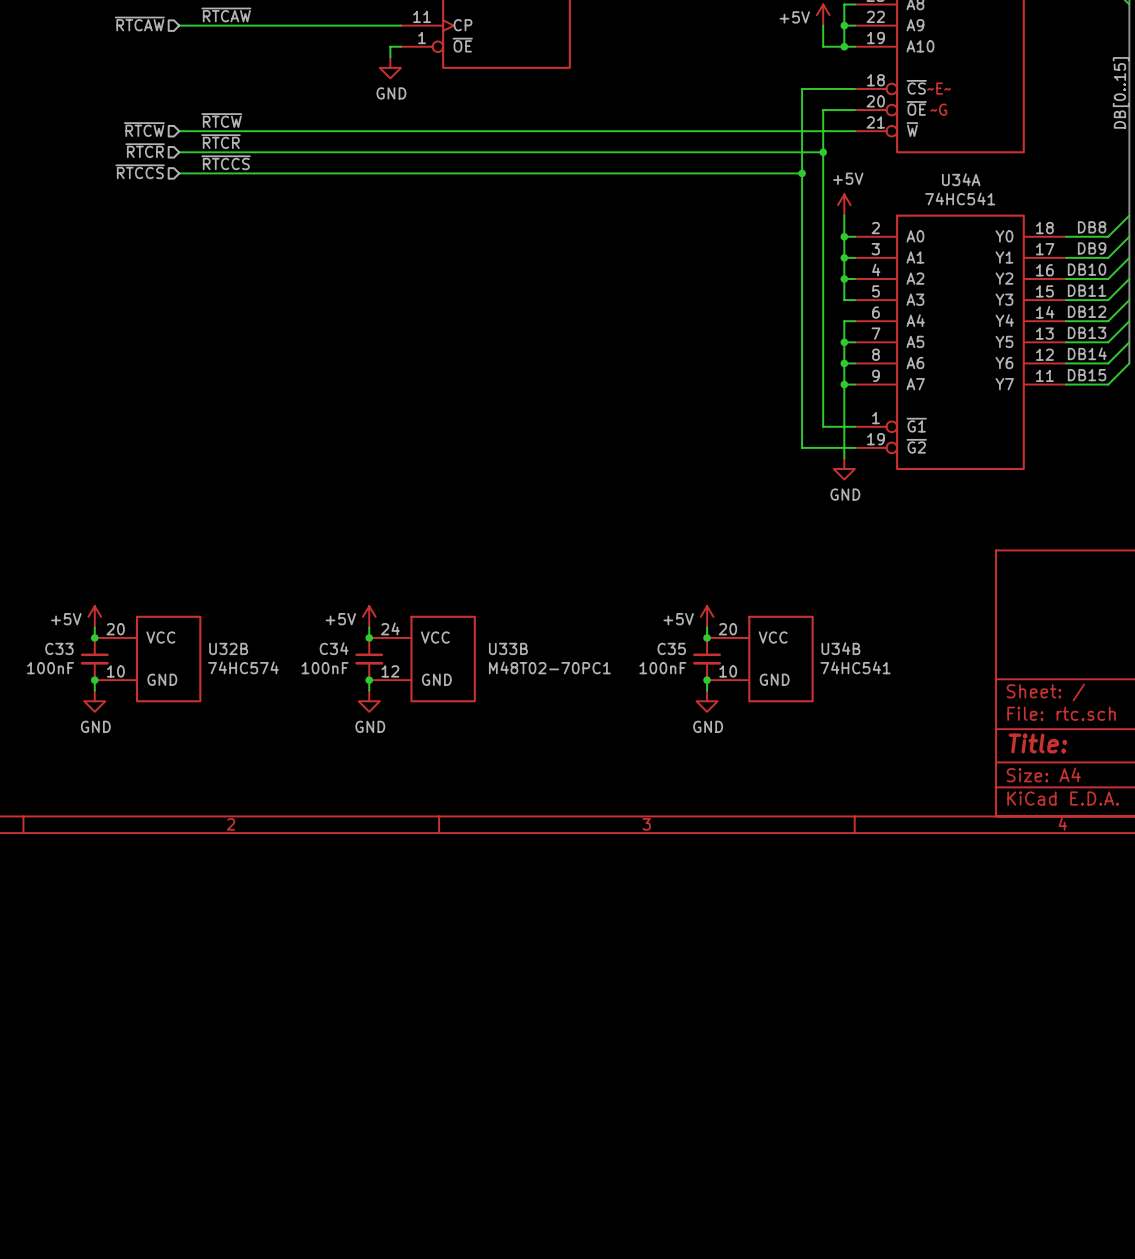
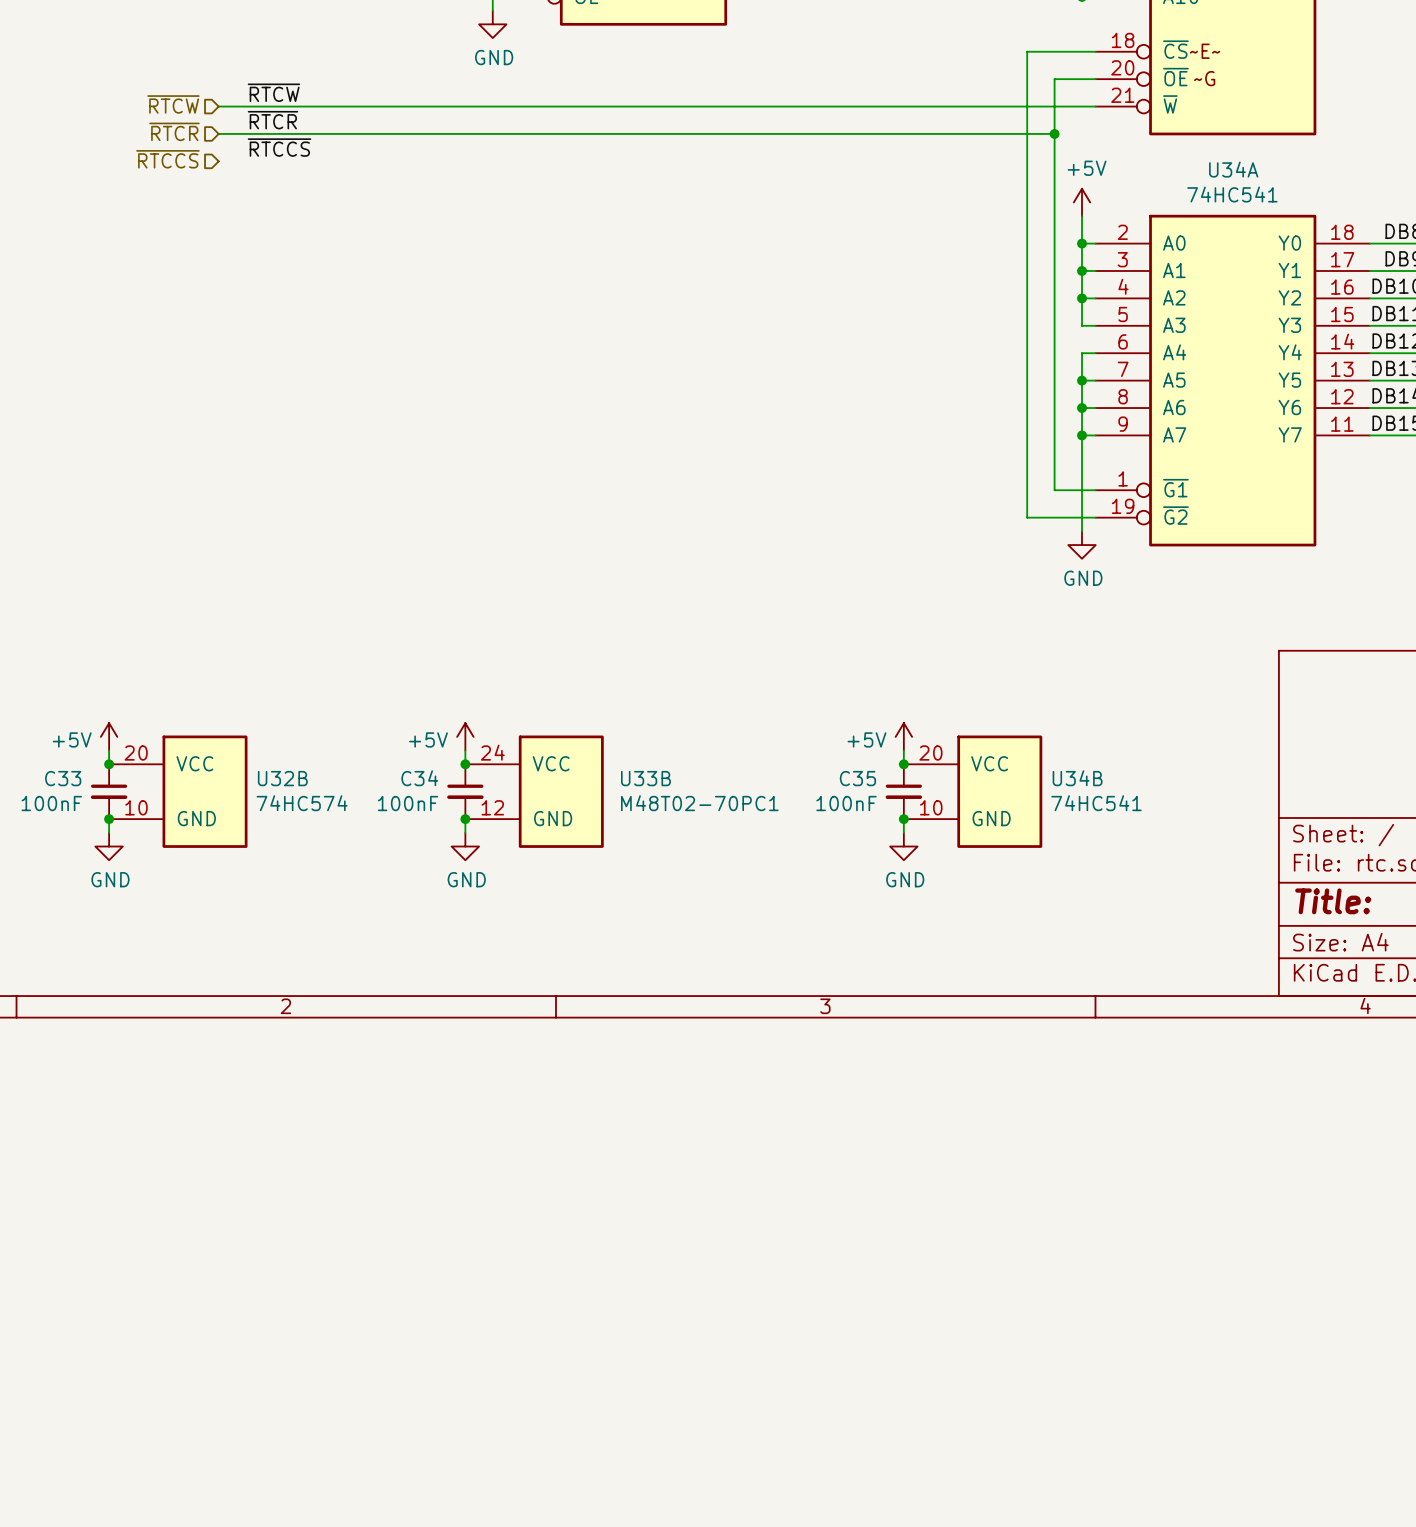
wire: (179, 173) (802, 173) -> none
junction: (802, 173) -> none

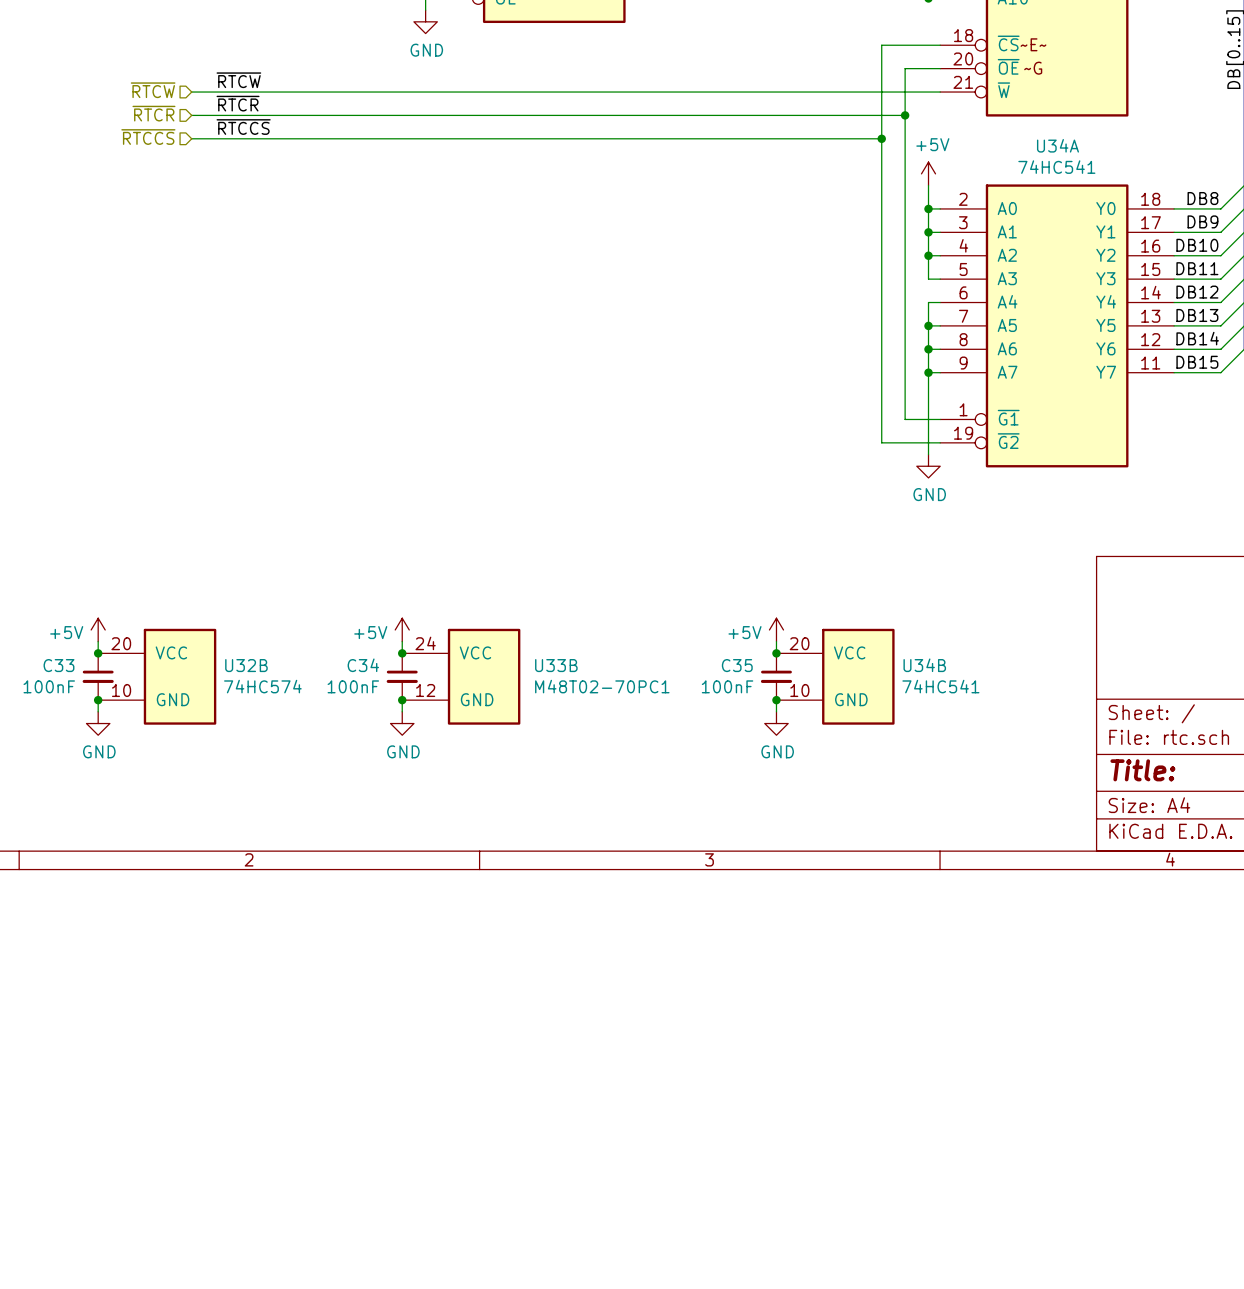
wire: none -> (191, 138) (881, 138)
junction: none -> (881, 138)

